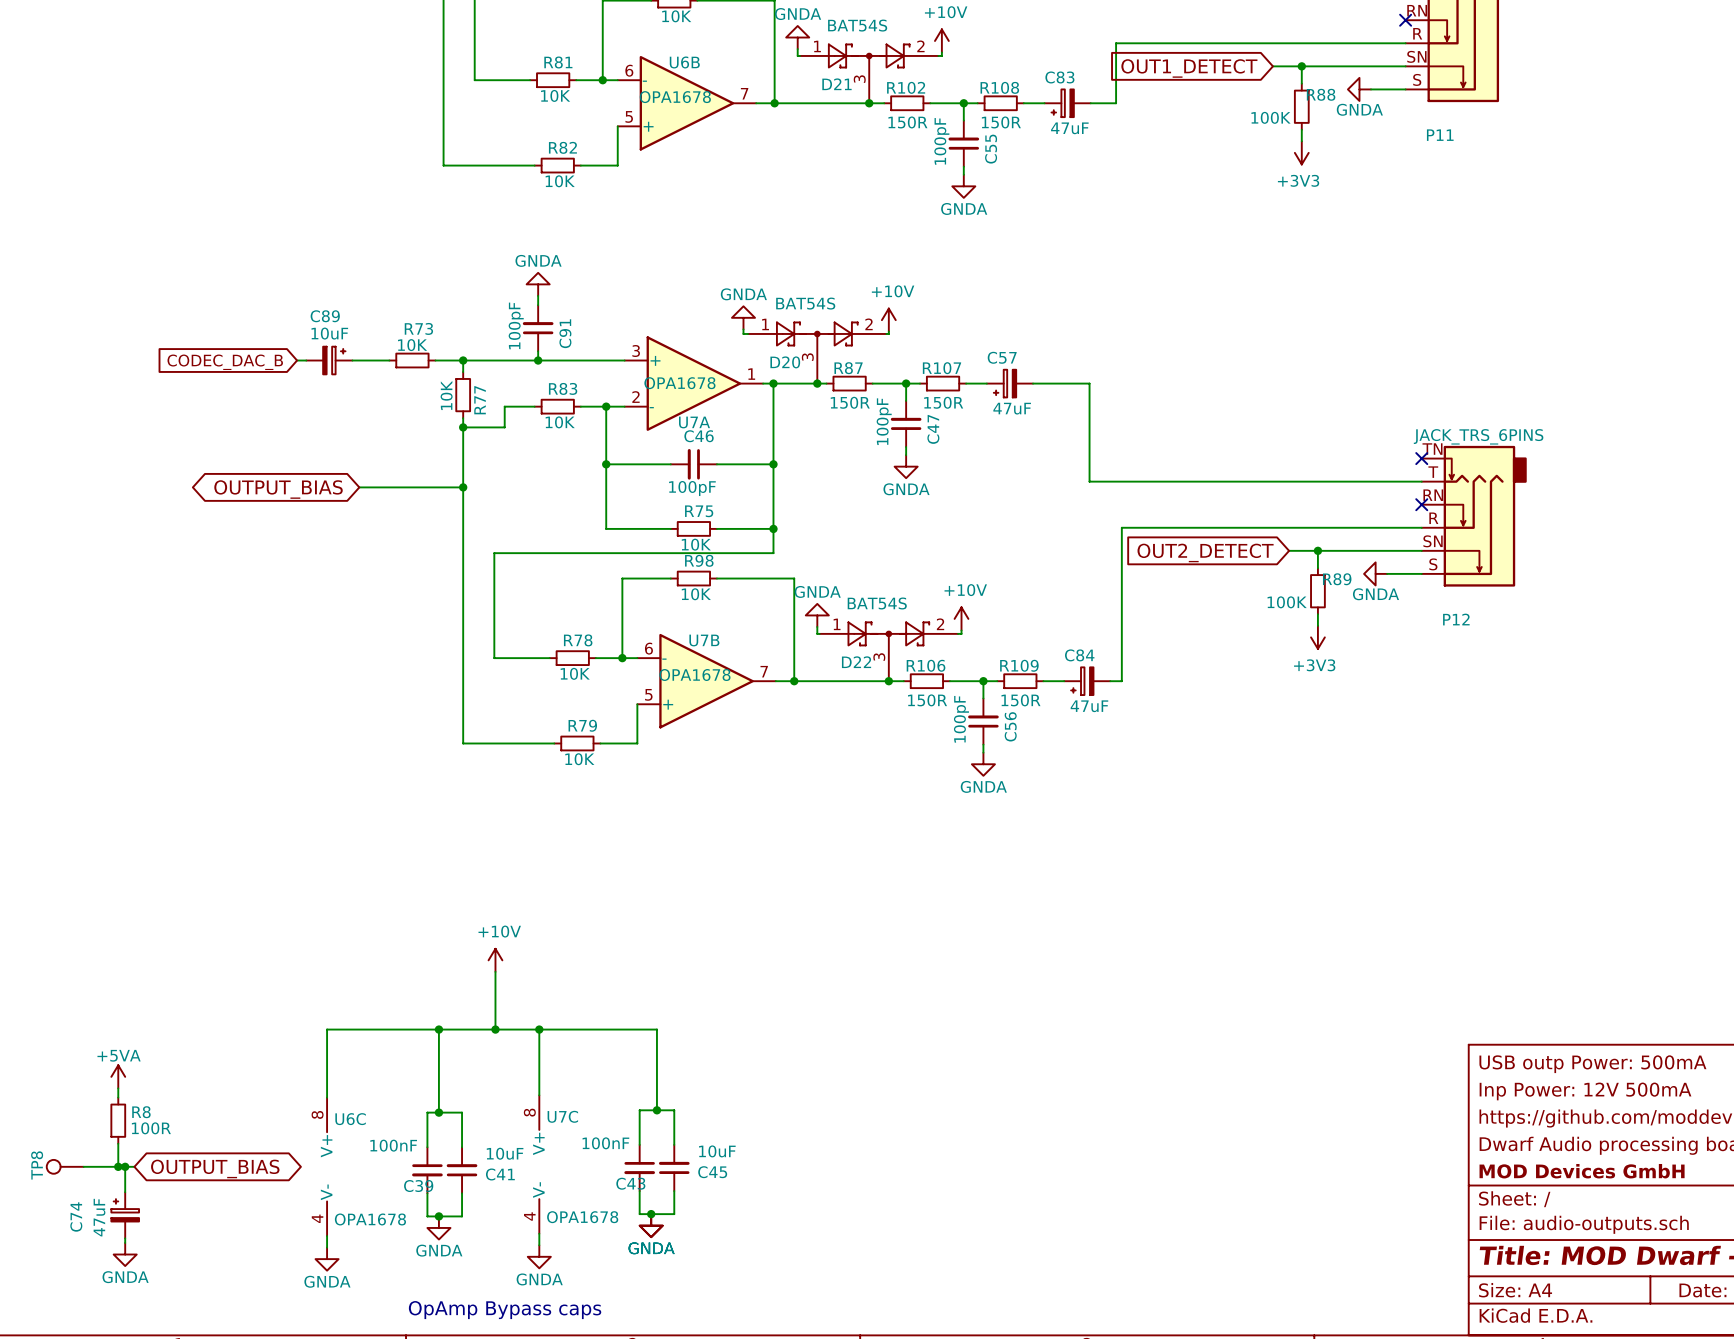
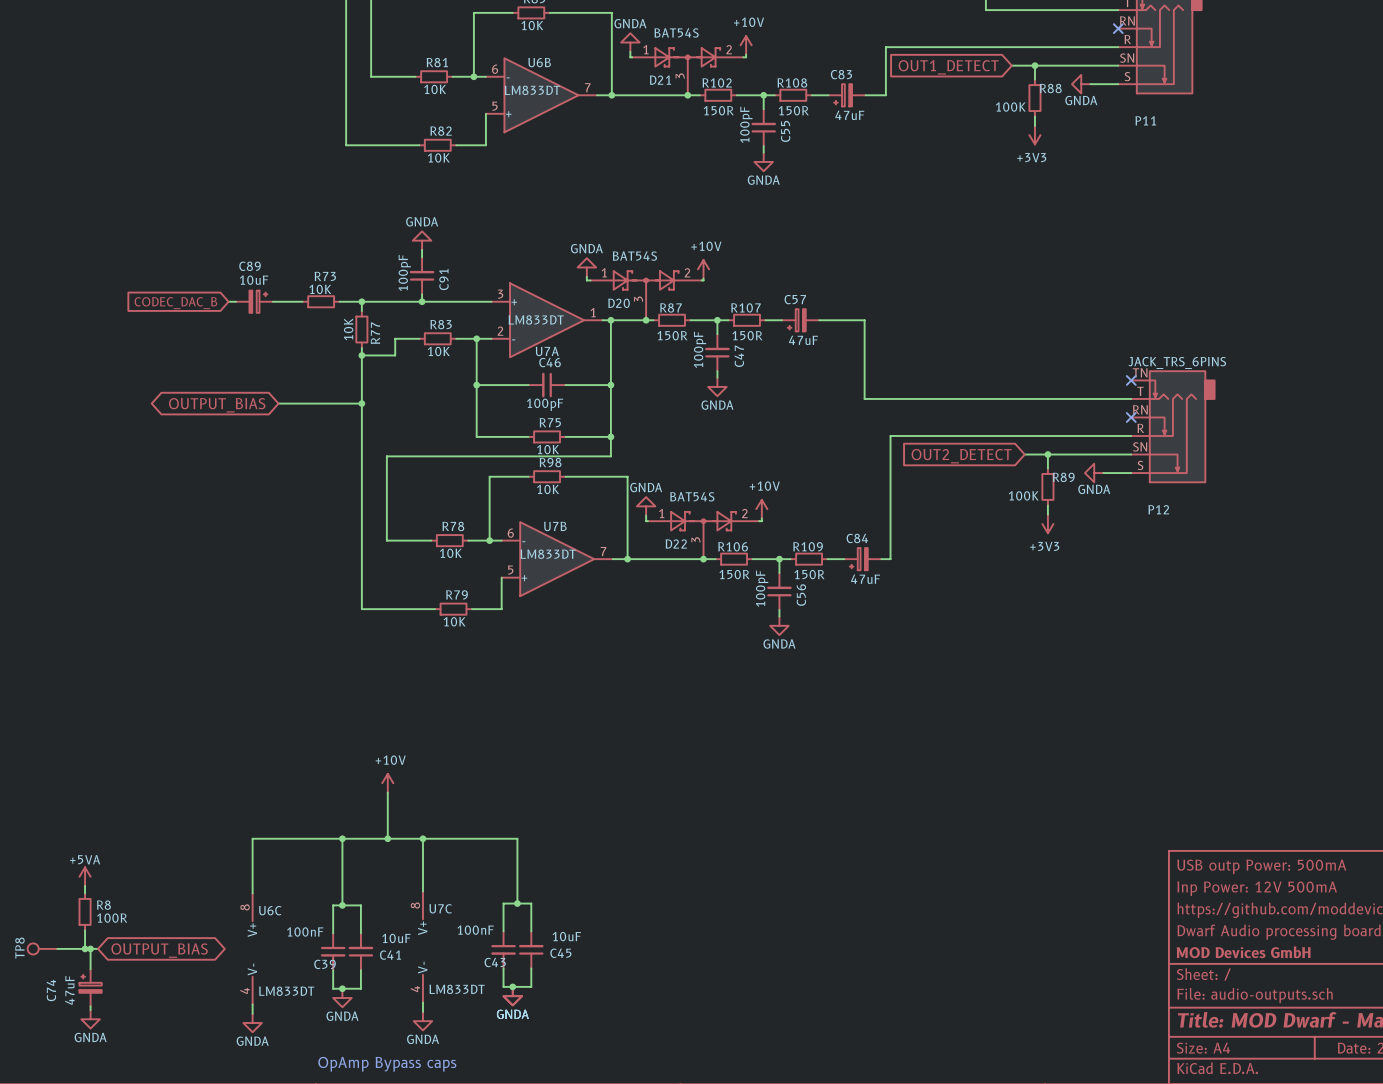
U6B value: OPA1678 (675, 97) -> LM833DT (532, 90)
U7A value: OPA1678 (679, 383) -> LM833DT (536, 319)
U7B value: OPA1678 (694, 675) -> LM833DT (548, 554)
U7C value: OPA1678 (582, 1217) -> LM833DT (457, 989)
U6C value: OPA1678 (370, 1219) -> LM833DT (286, 991)

